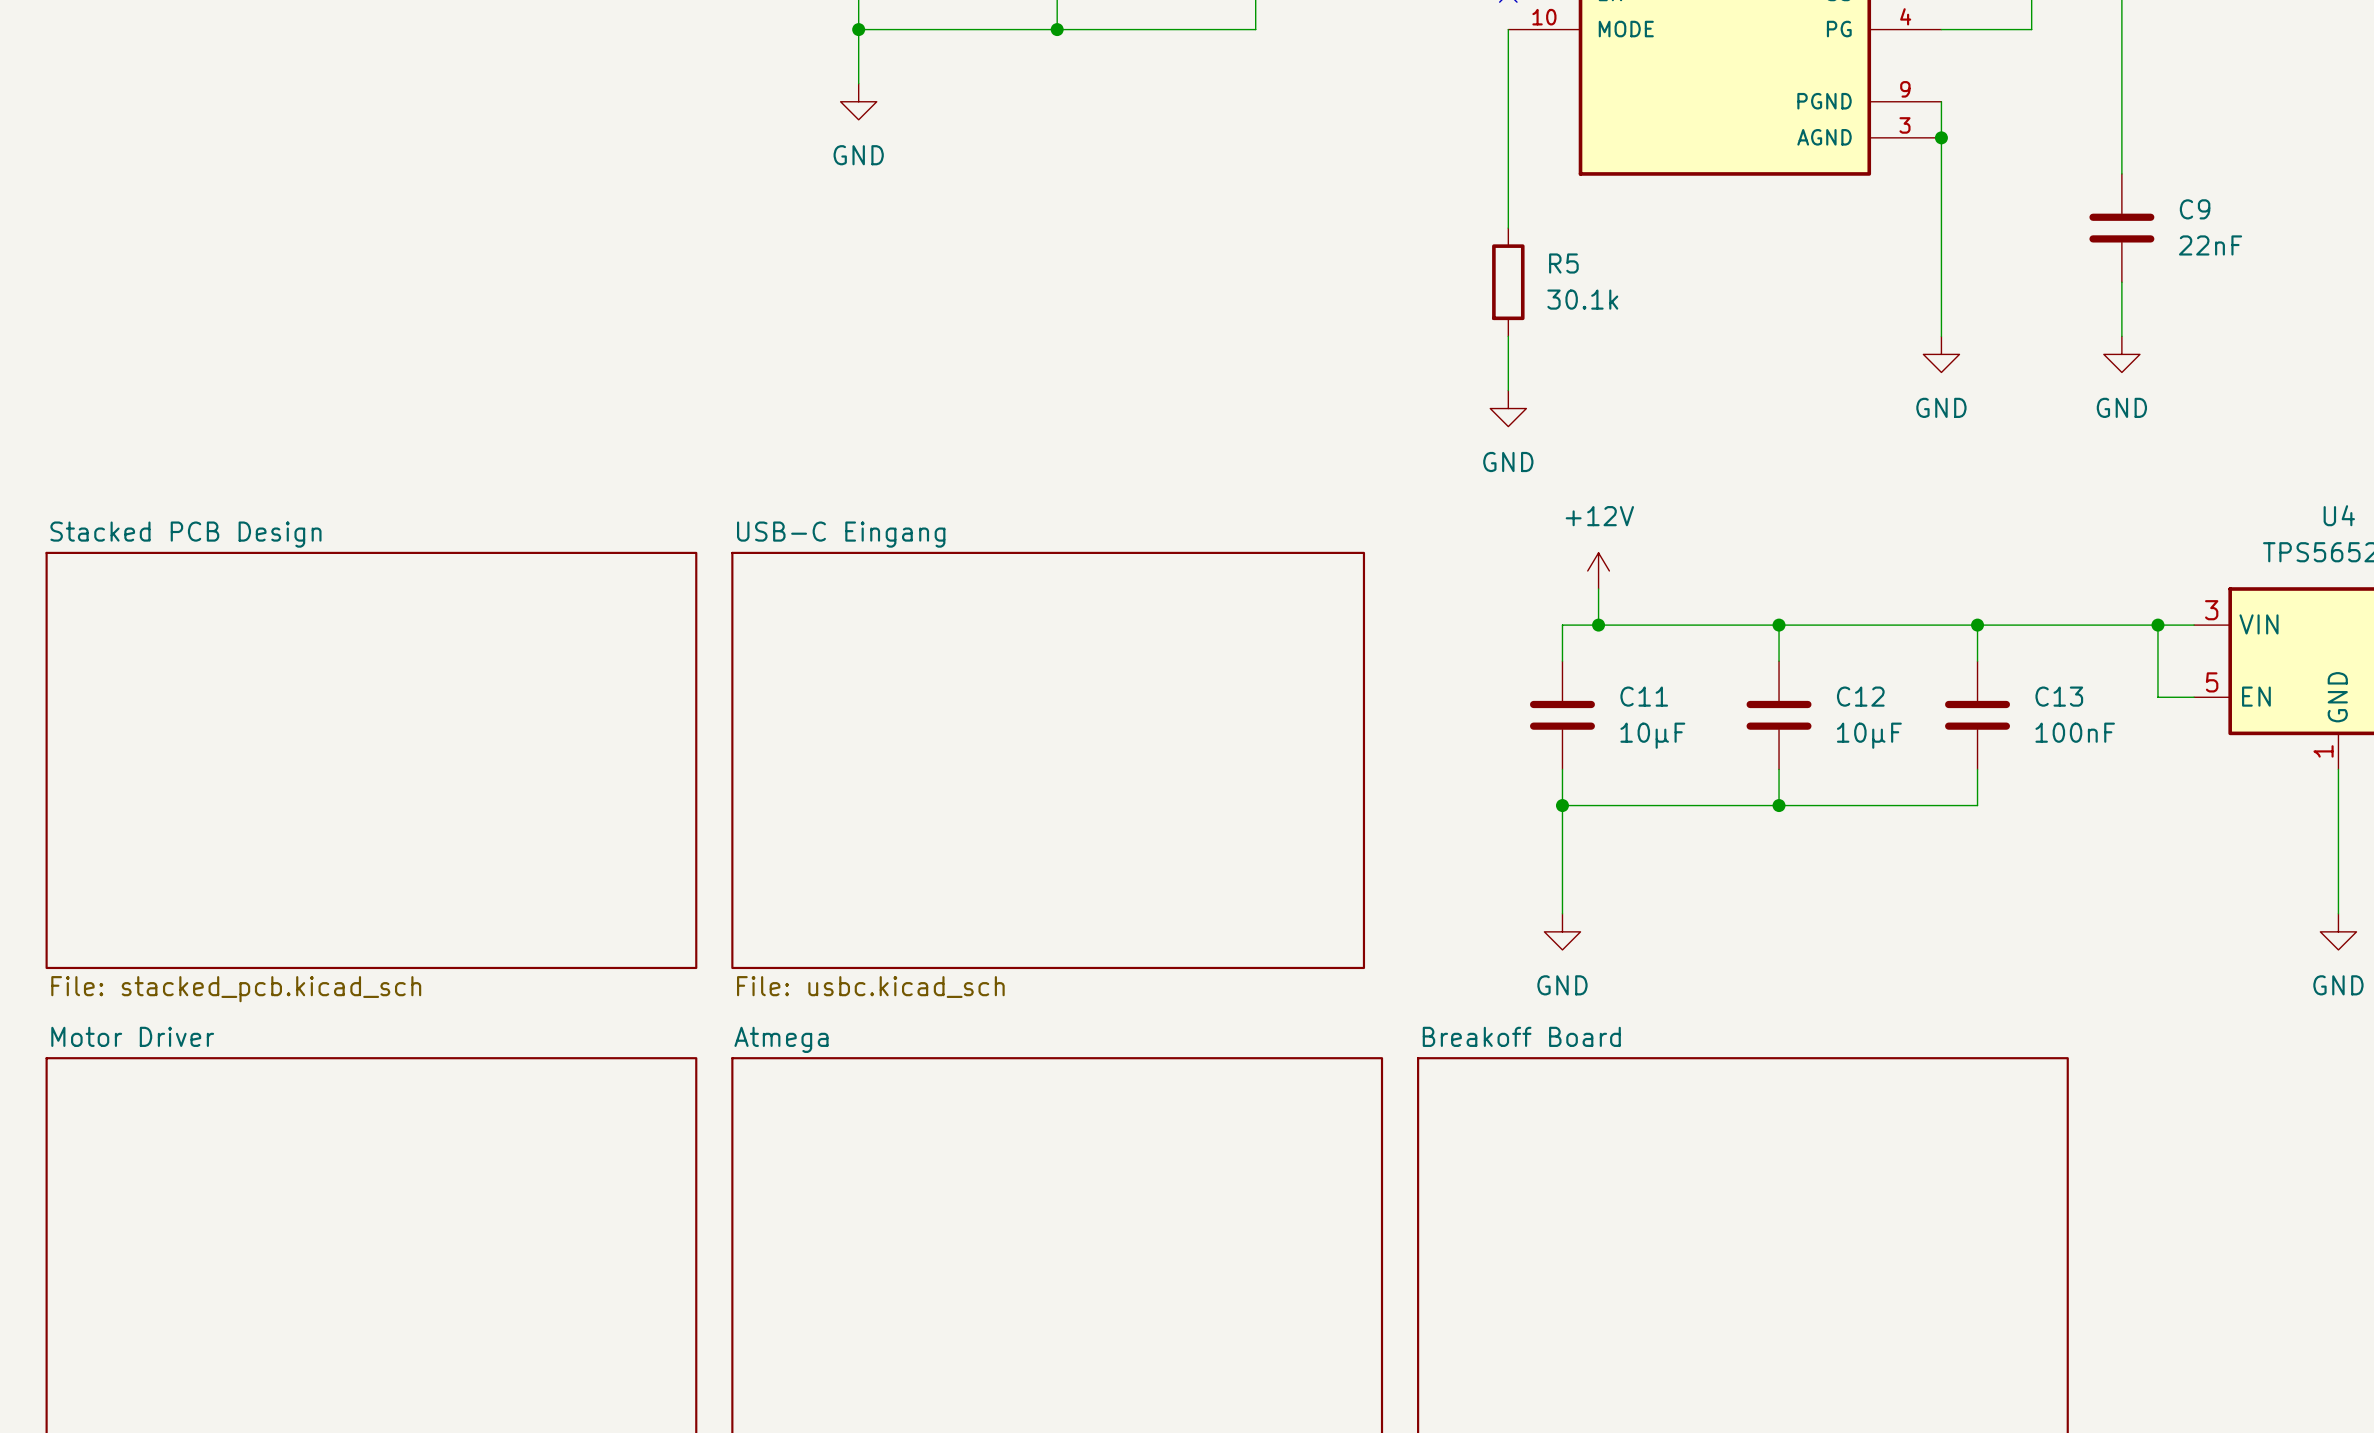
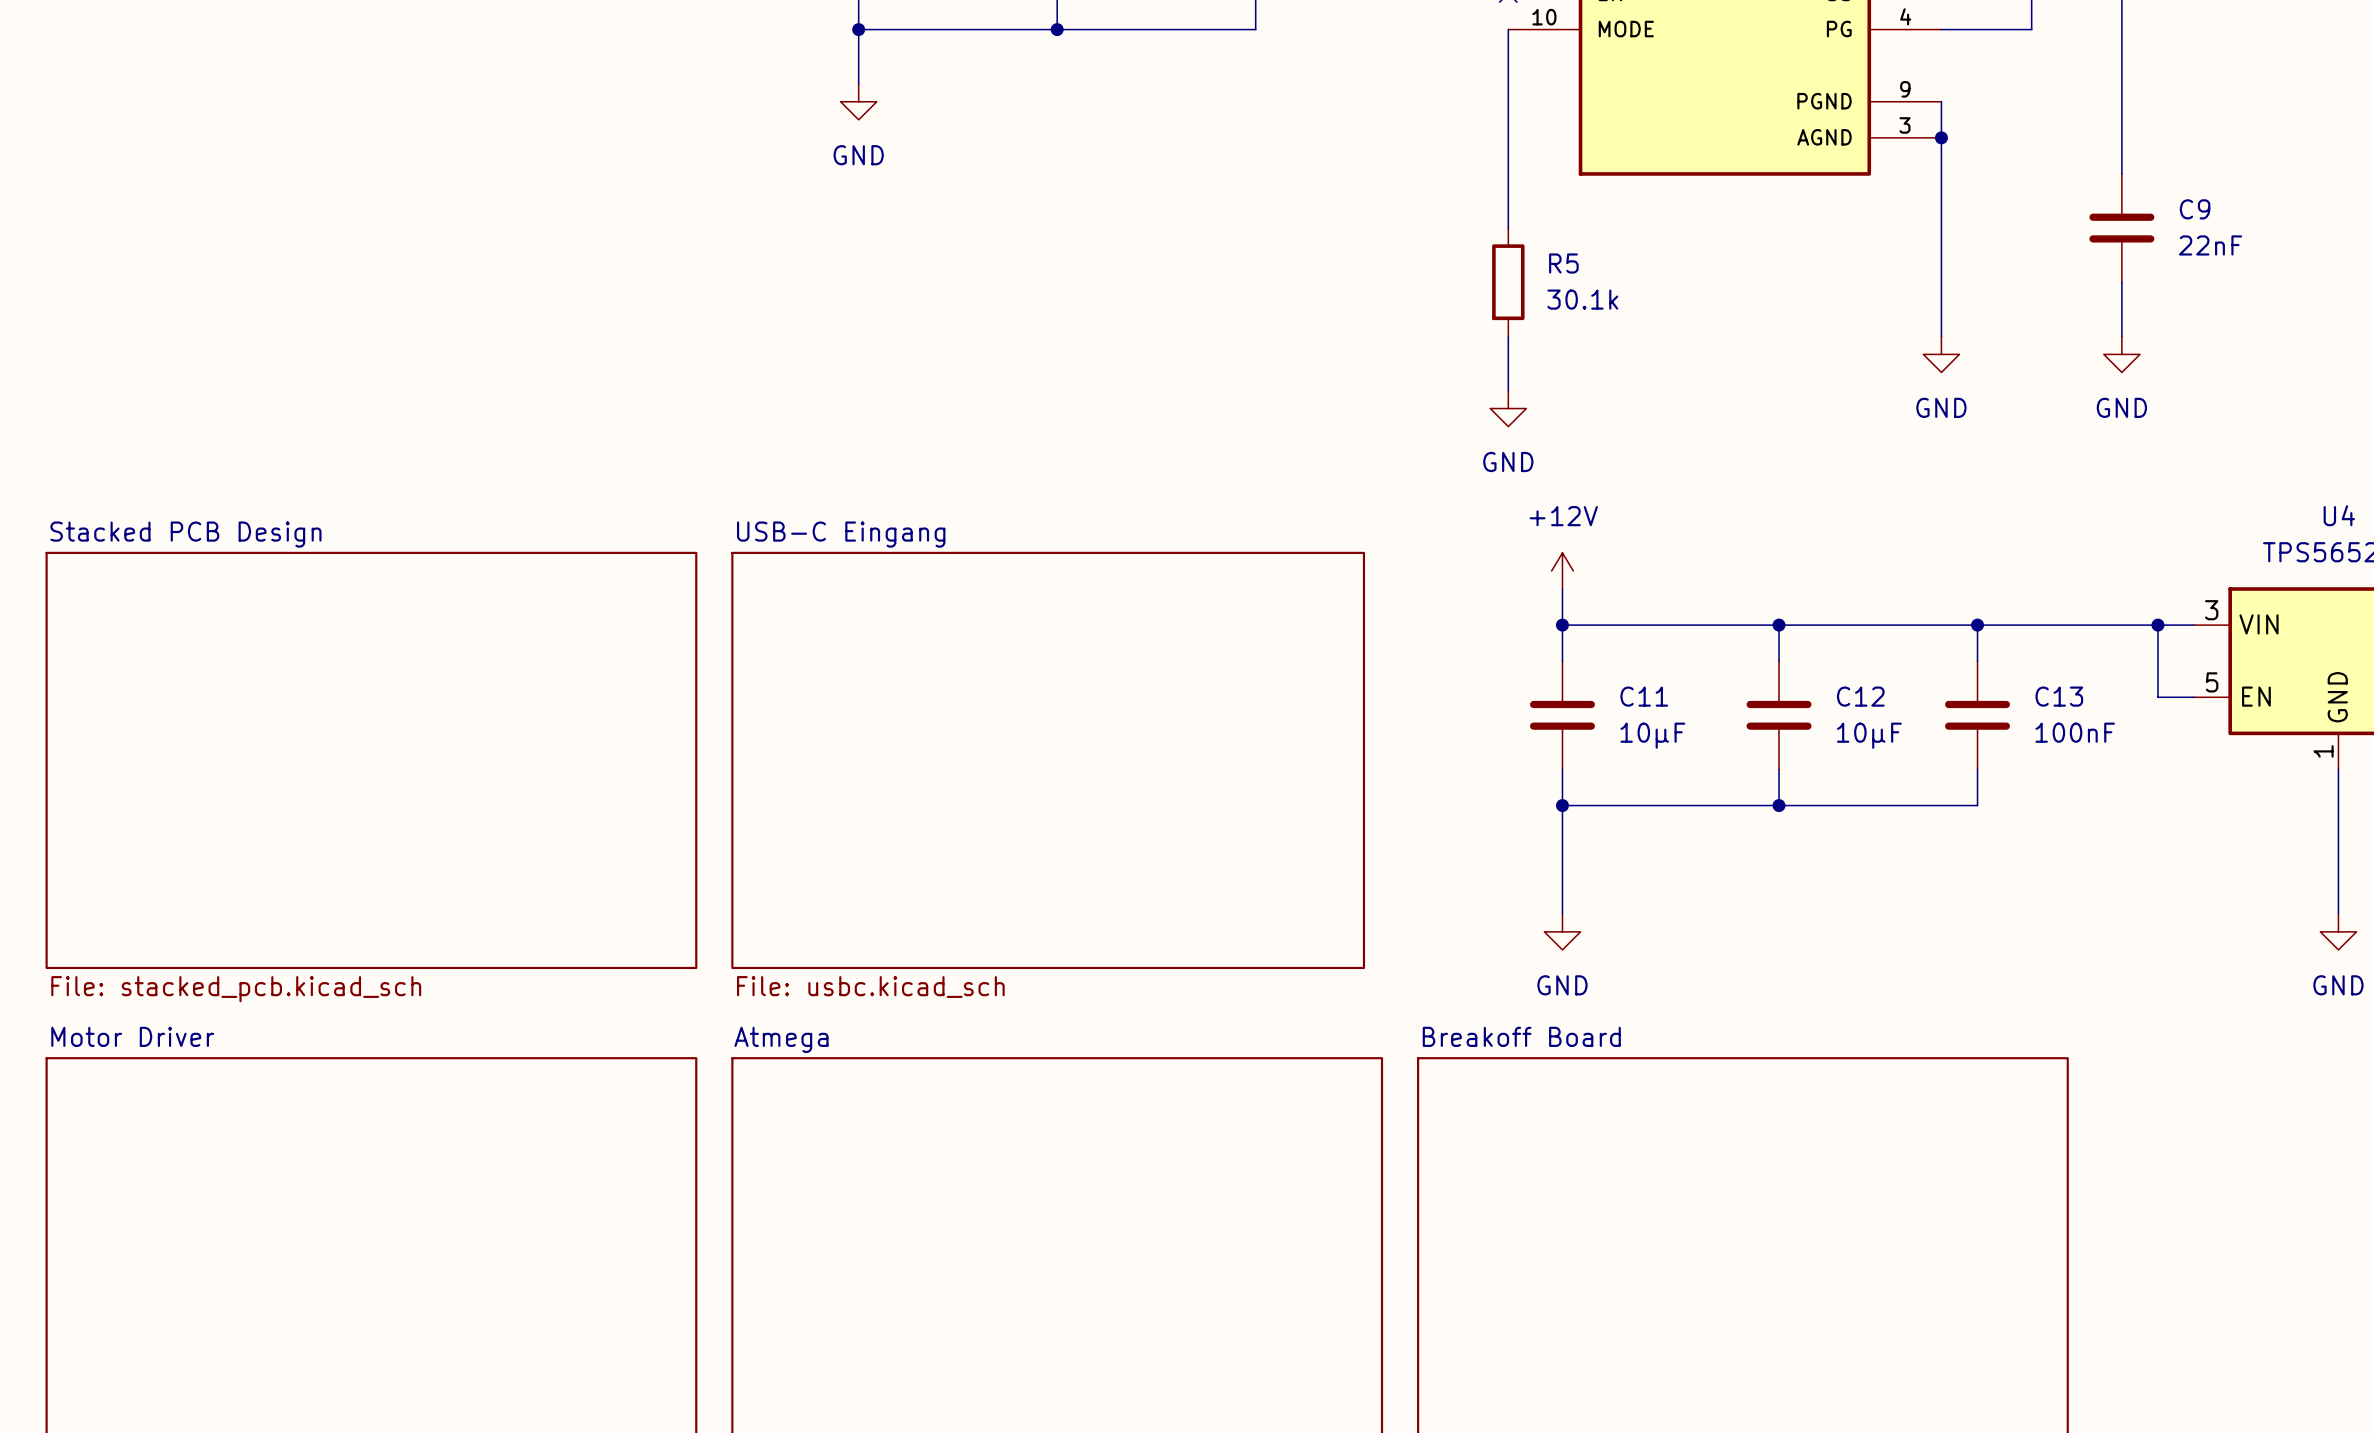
power symbol position: +12V (1598, 570) -> +12V (1562, 570)
wire: (1598, 589) (1598, 625) -> (1562, 589) (1562, 625)
junction position: (1598, 625) -> (1562, 625)

